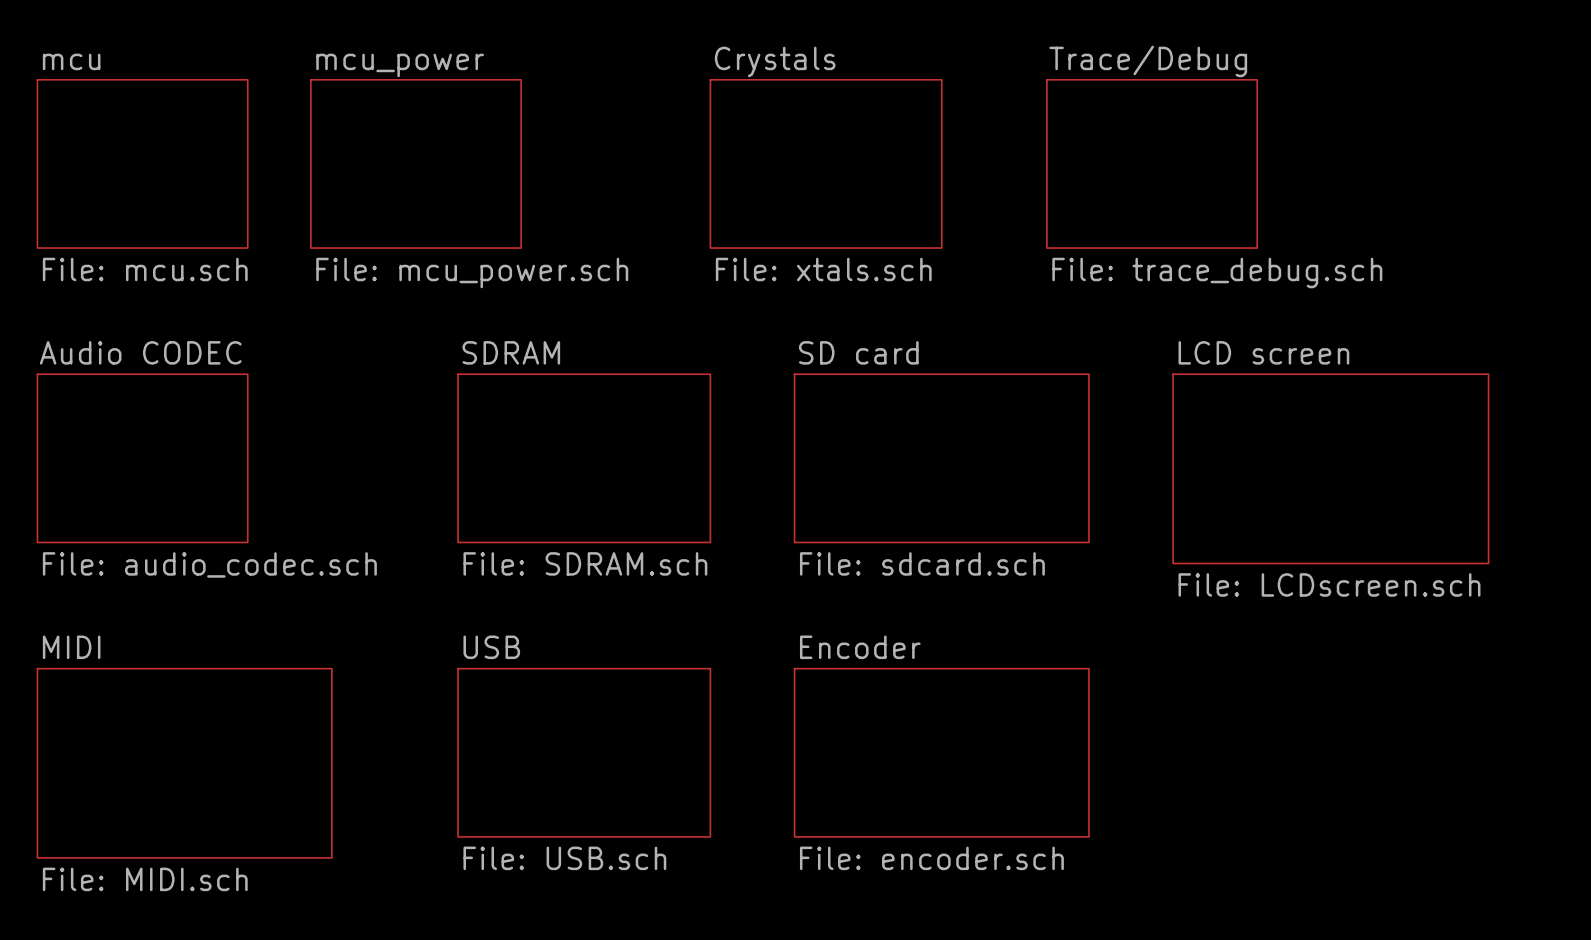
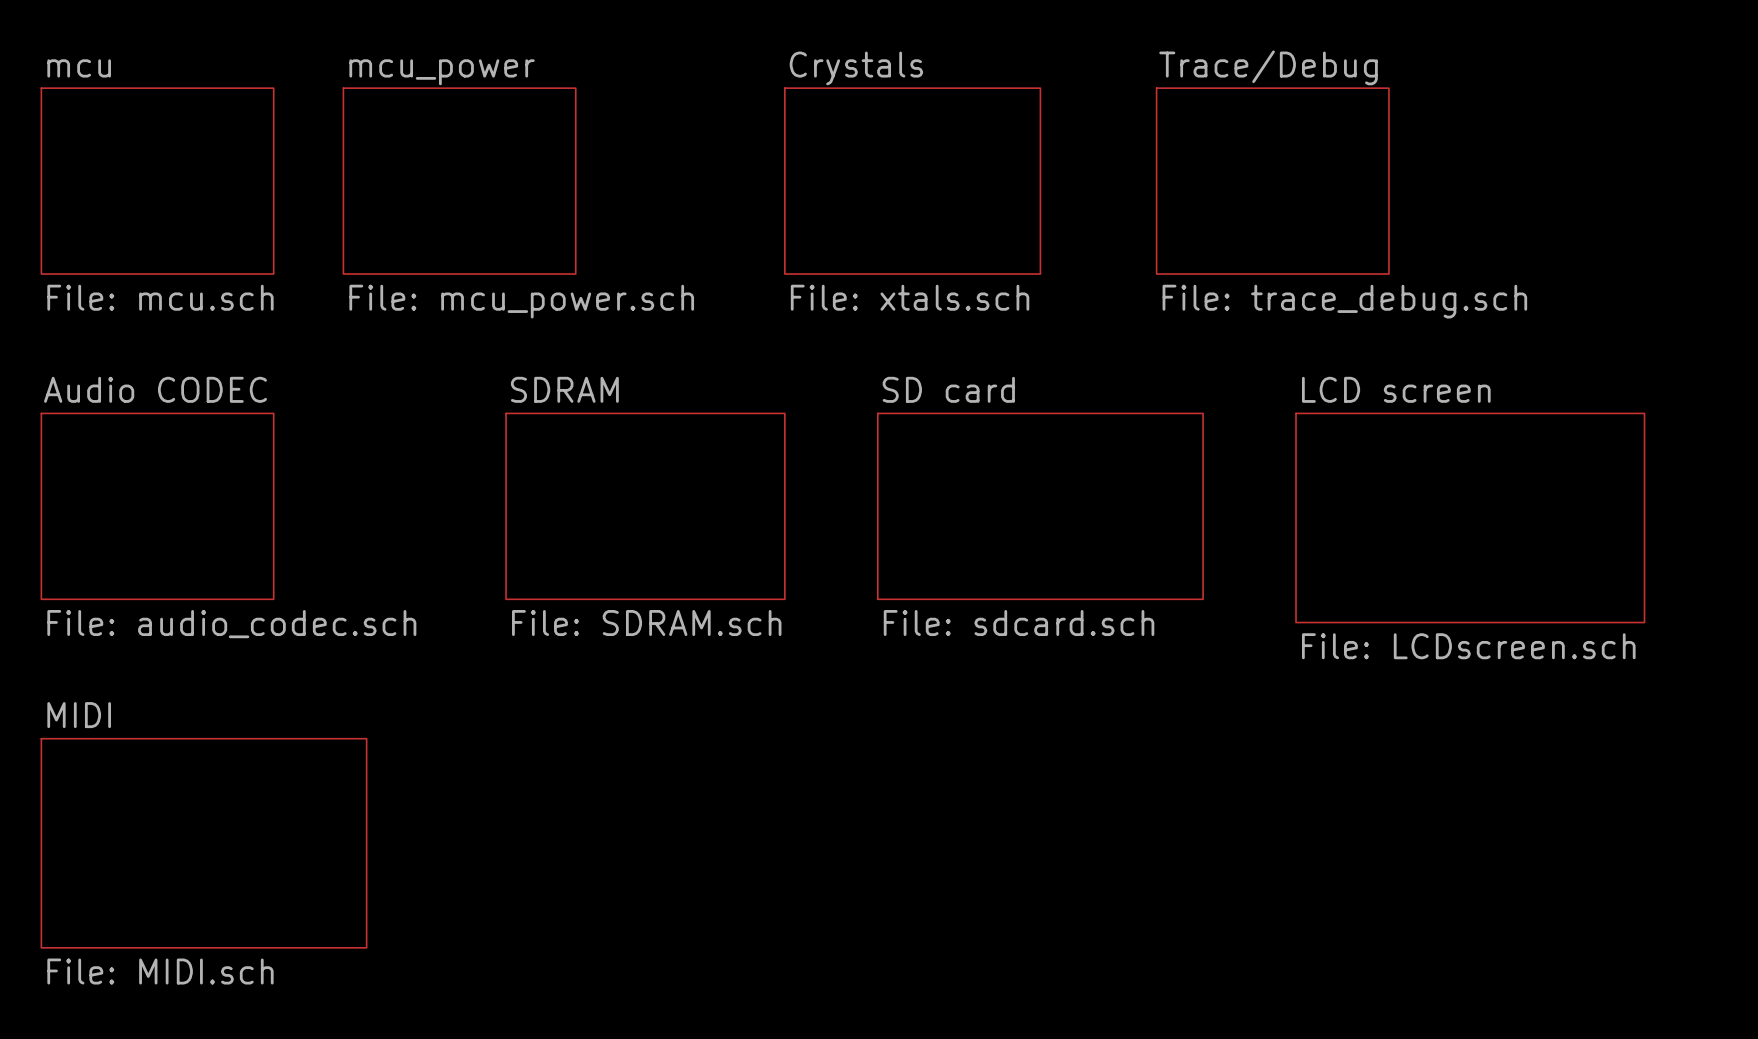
sheet USB: File: USB.sch (584, 752) -> none
sheet Encoder: File: encoder.sch (941, 752) -> none

